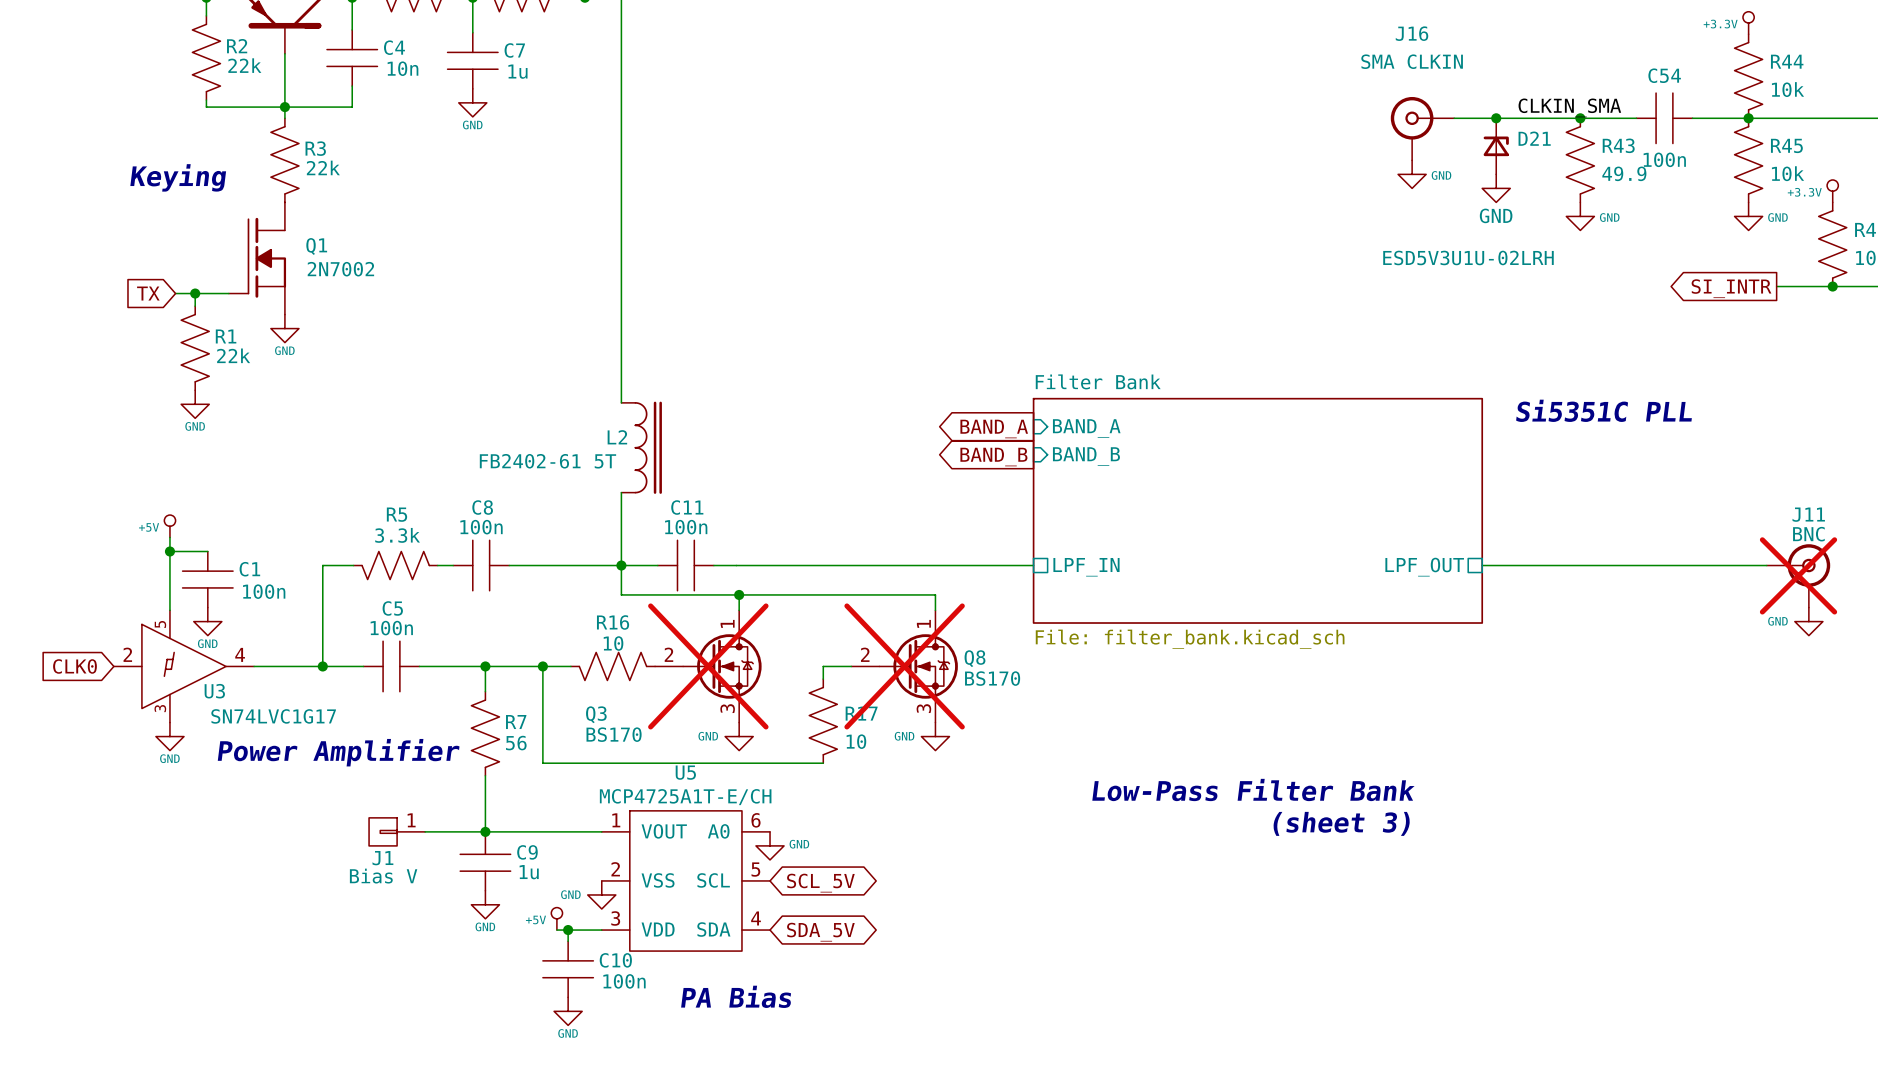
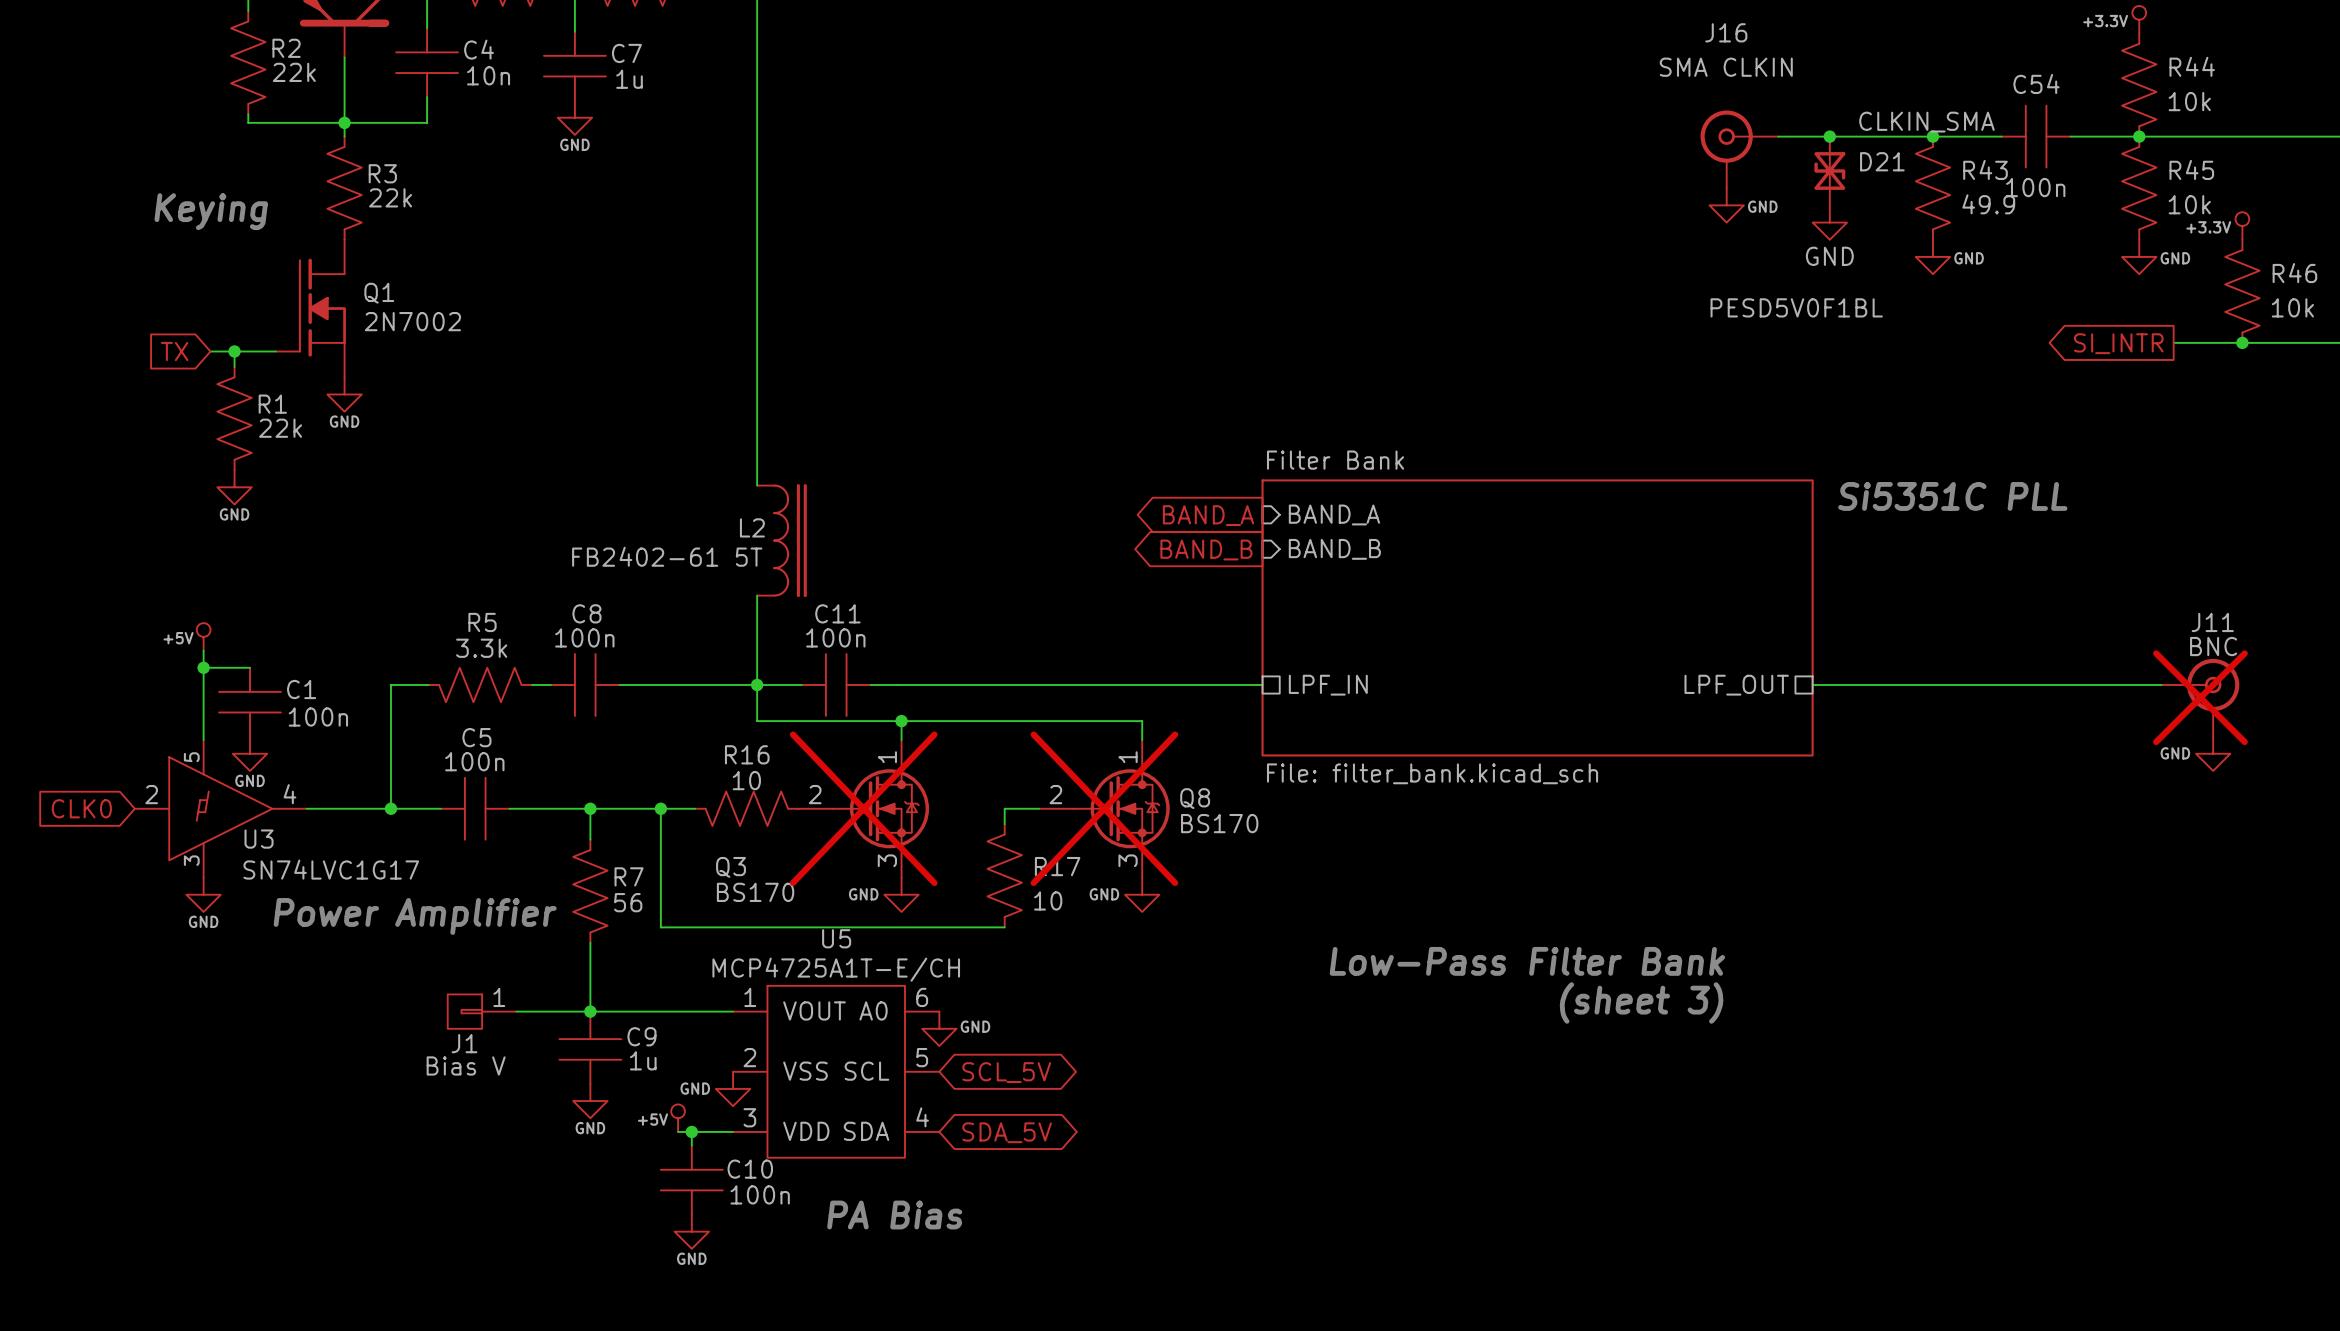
D21 symbol: [1483, 118, 1509, 175] -> [1814, 136, 1846, 206]
D21 value: ESD5V3U1U-02LRH (1468, 257) -> PESD5V0F1BL (1796, 307)

